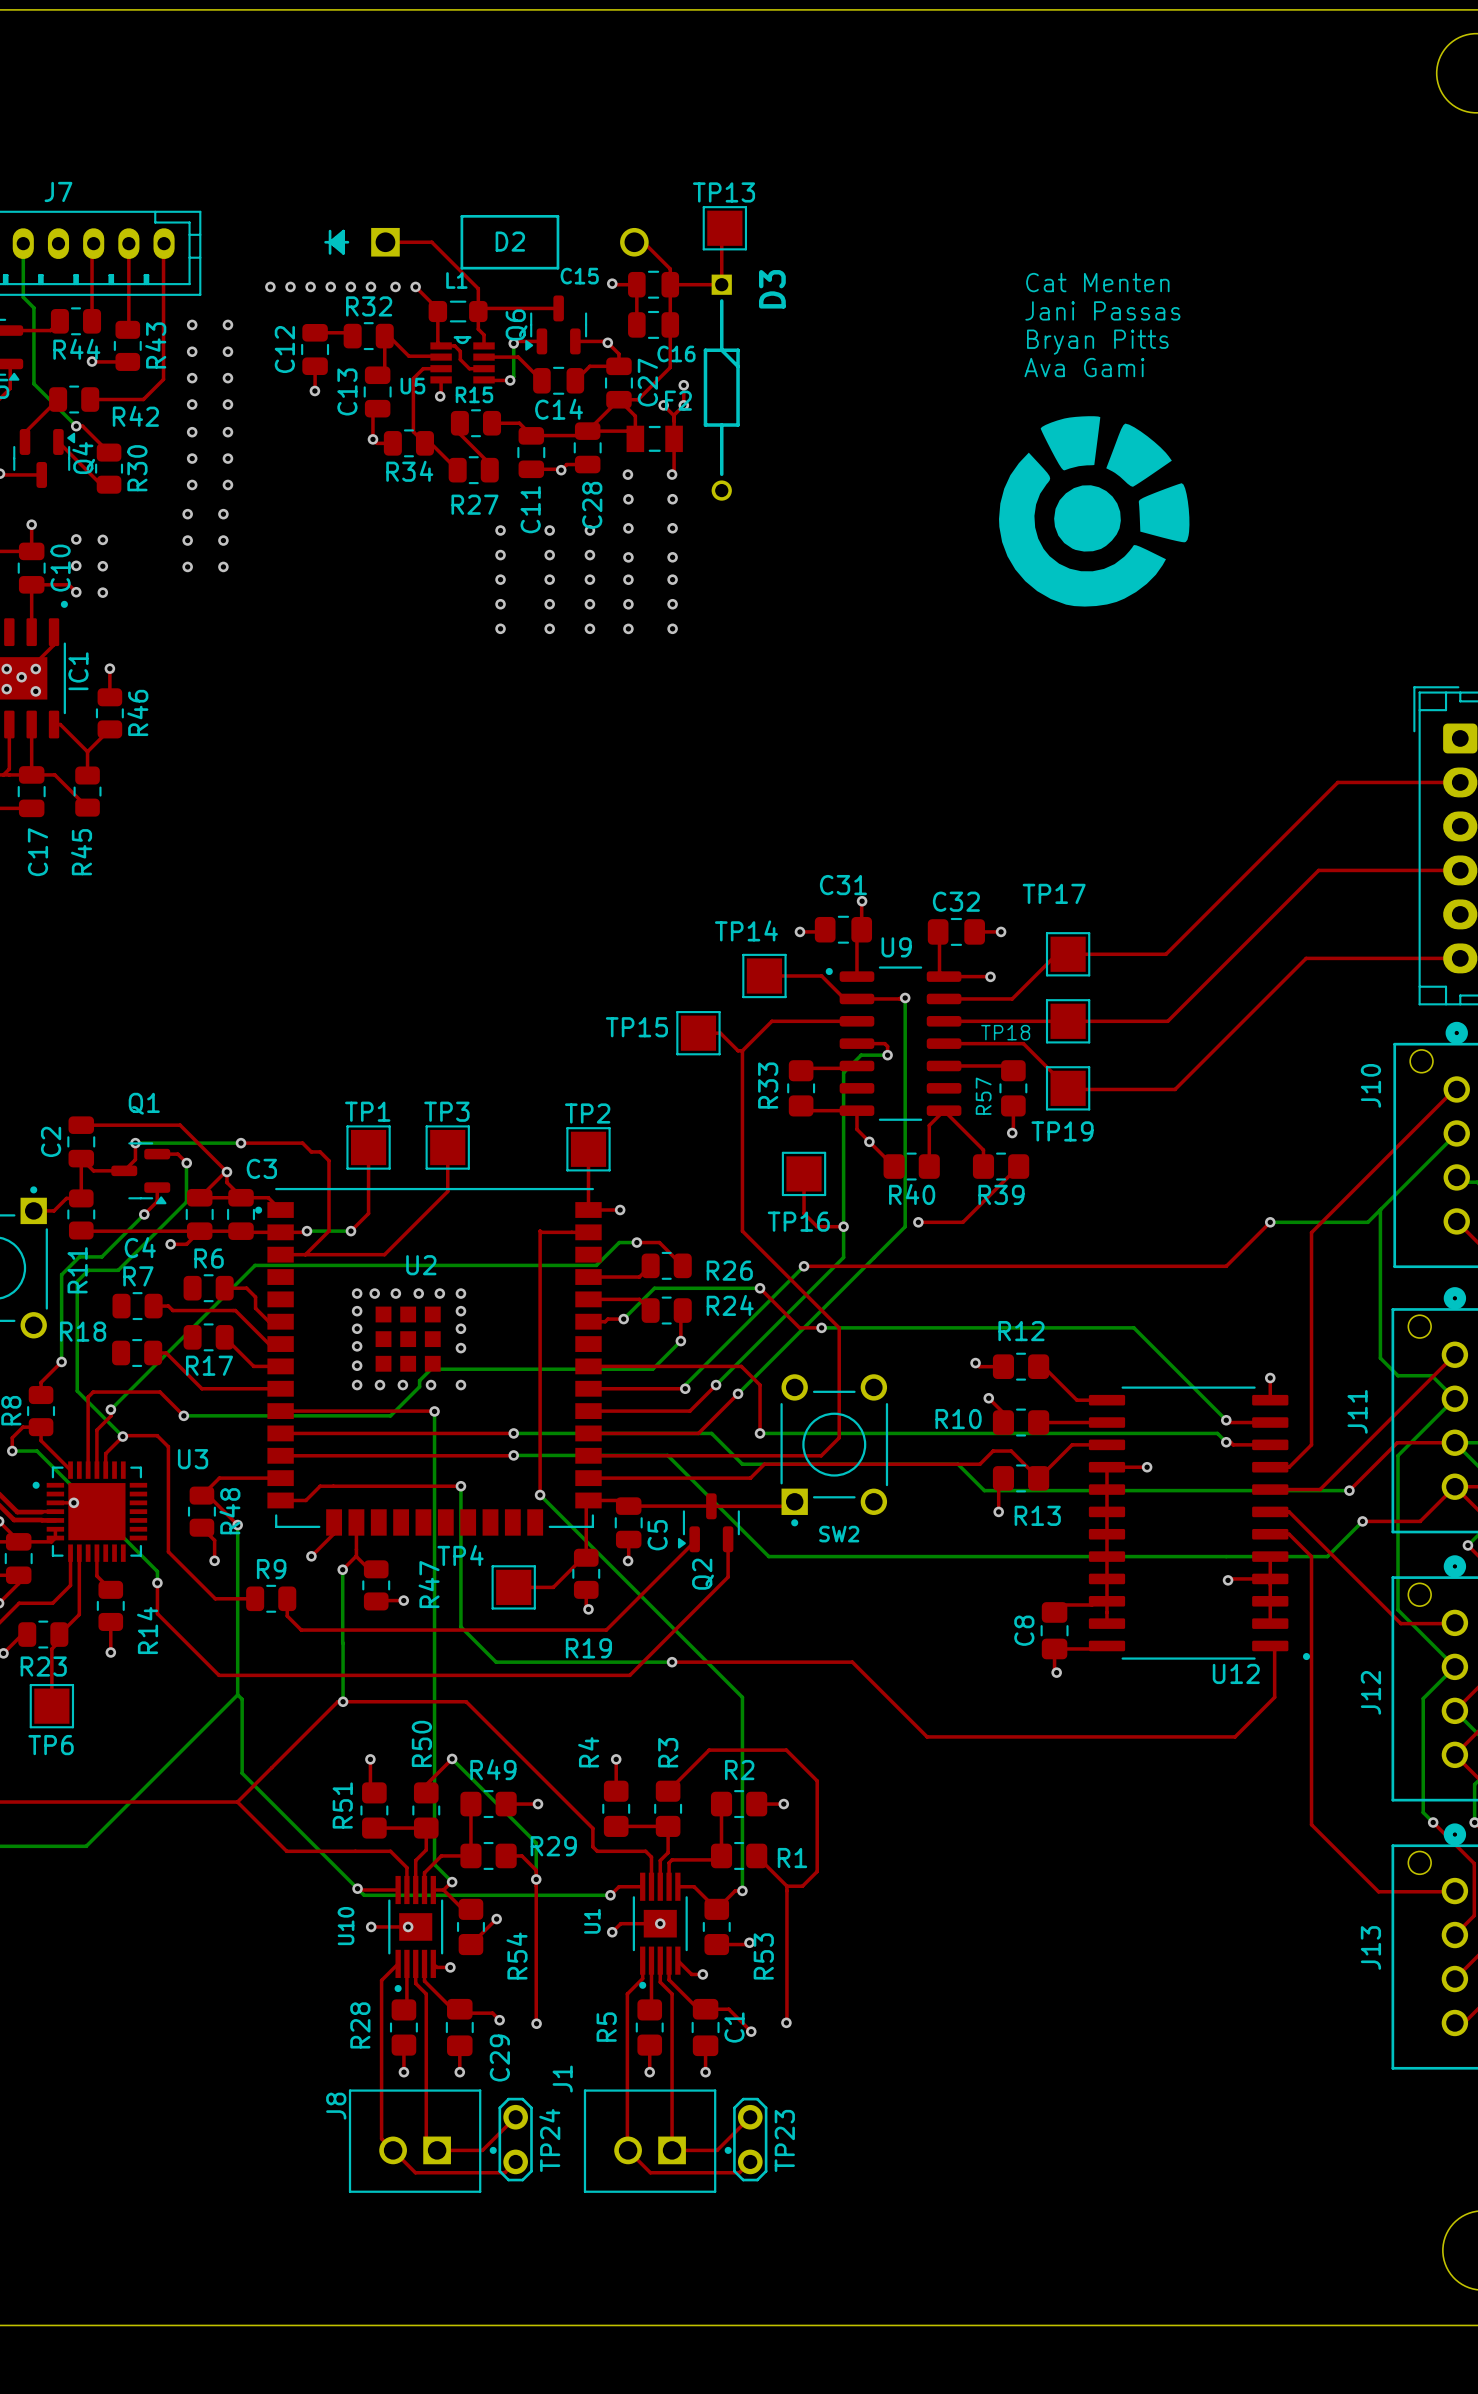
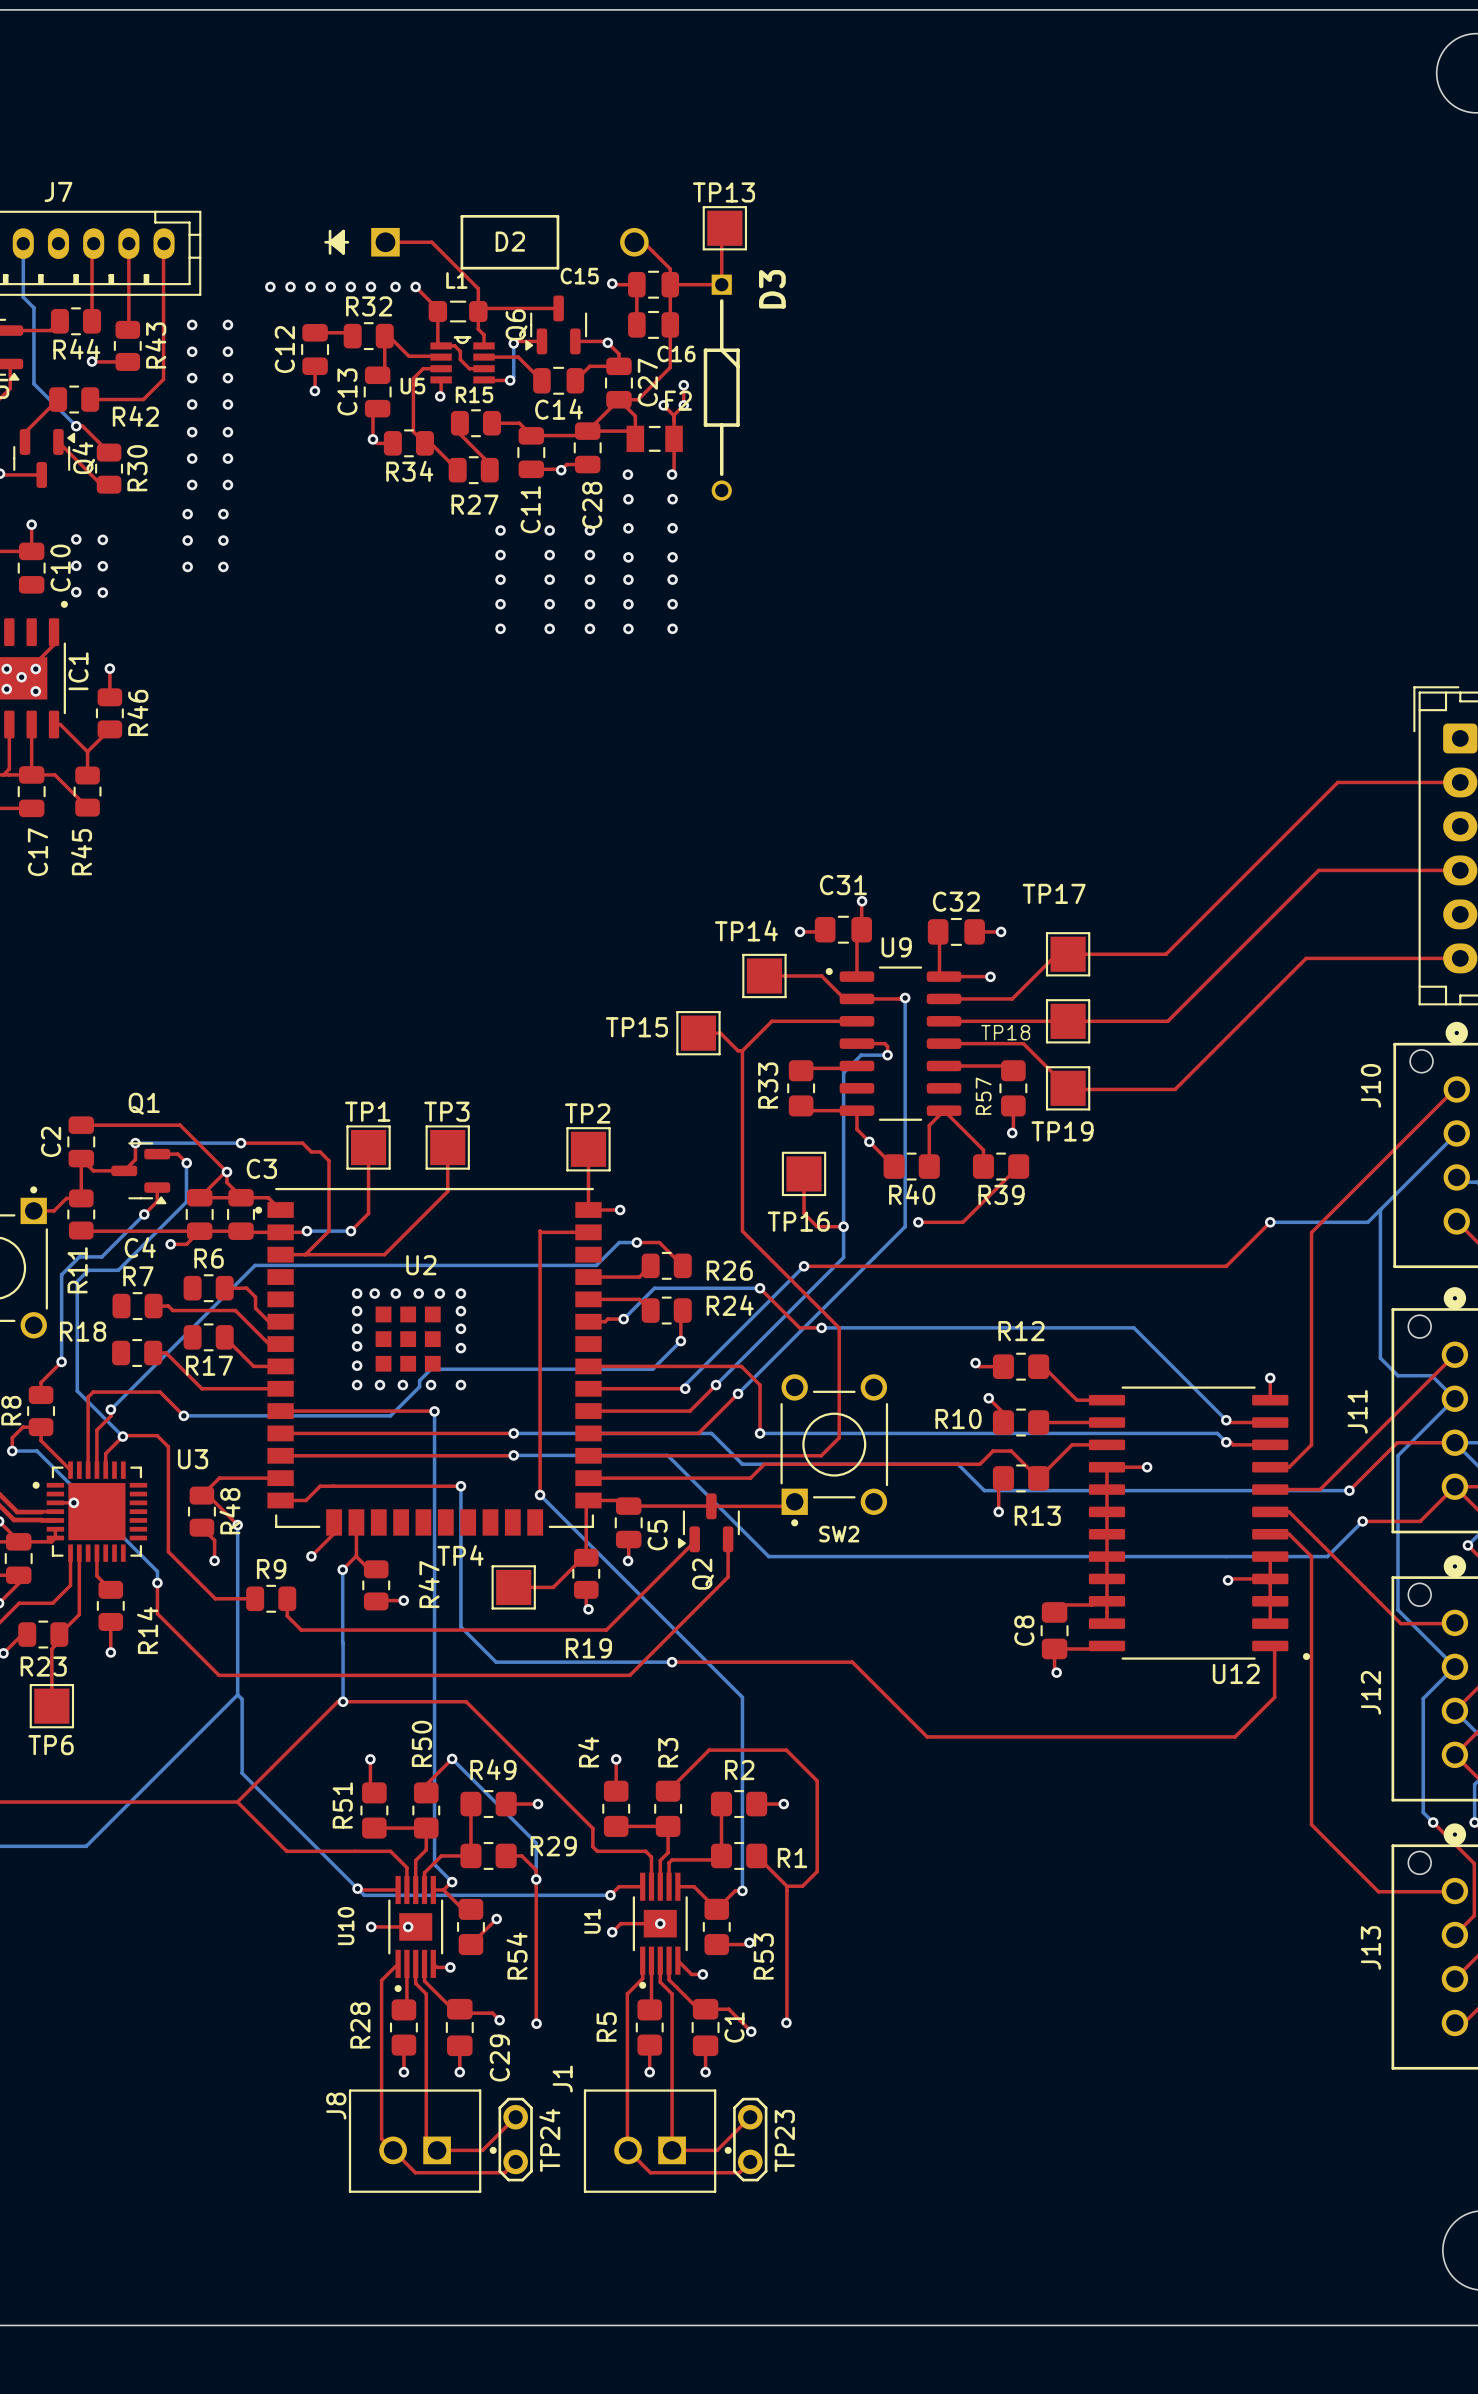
text: Cat Menten (1097, 282) -> none
text: Jani Passas (1102, 310) -> none
text: Bryan Pitts (1097, 342) -> none
text: Ava Gami (1084, 367) -> none
drawing: [999, 416, 1190, 607] -> none
top track: (76, 592) (68, 584) (31, 584) (31, 632) -> none

